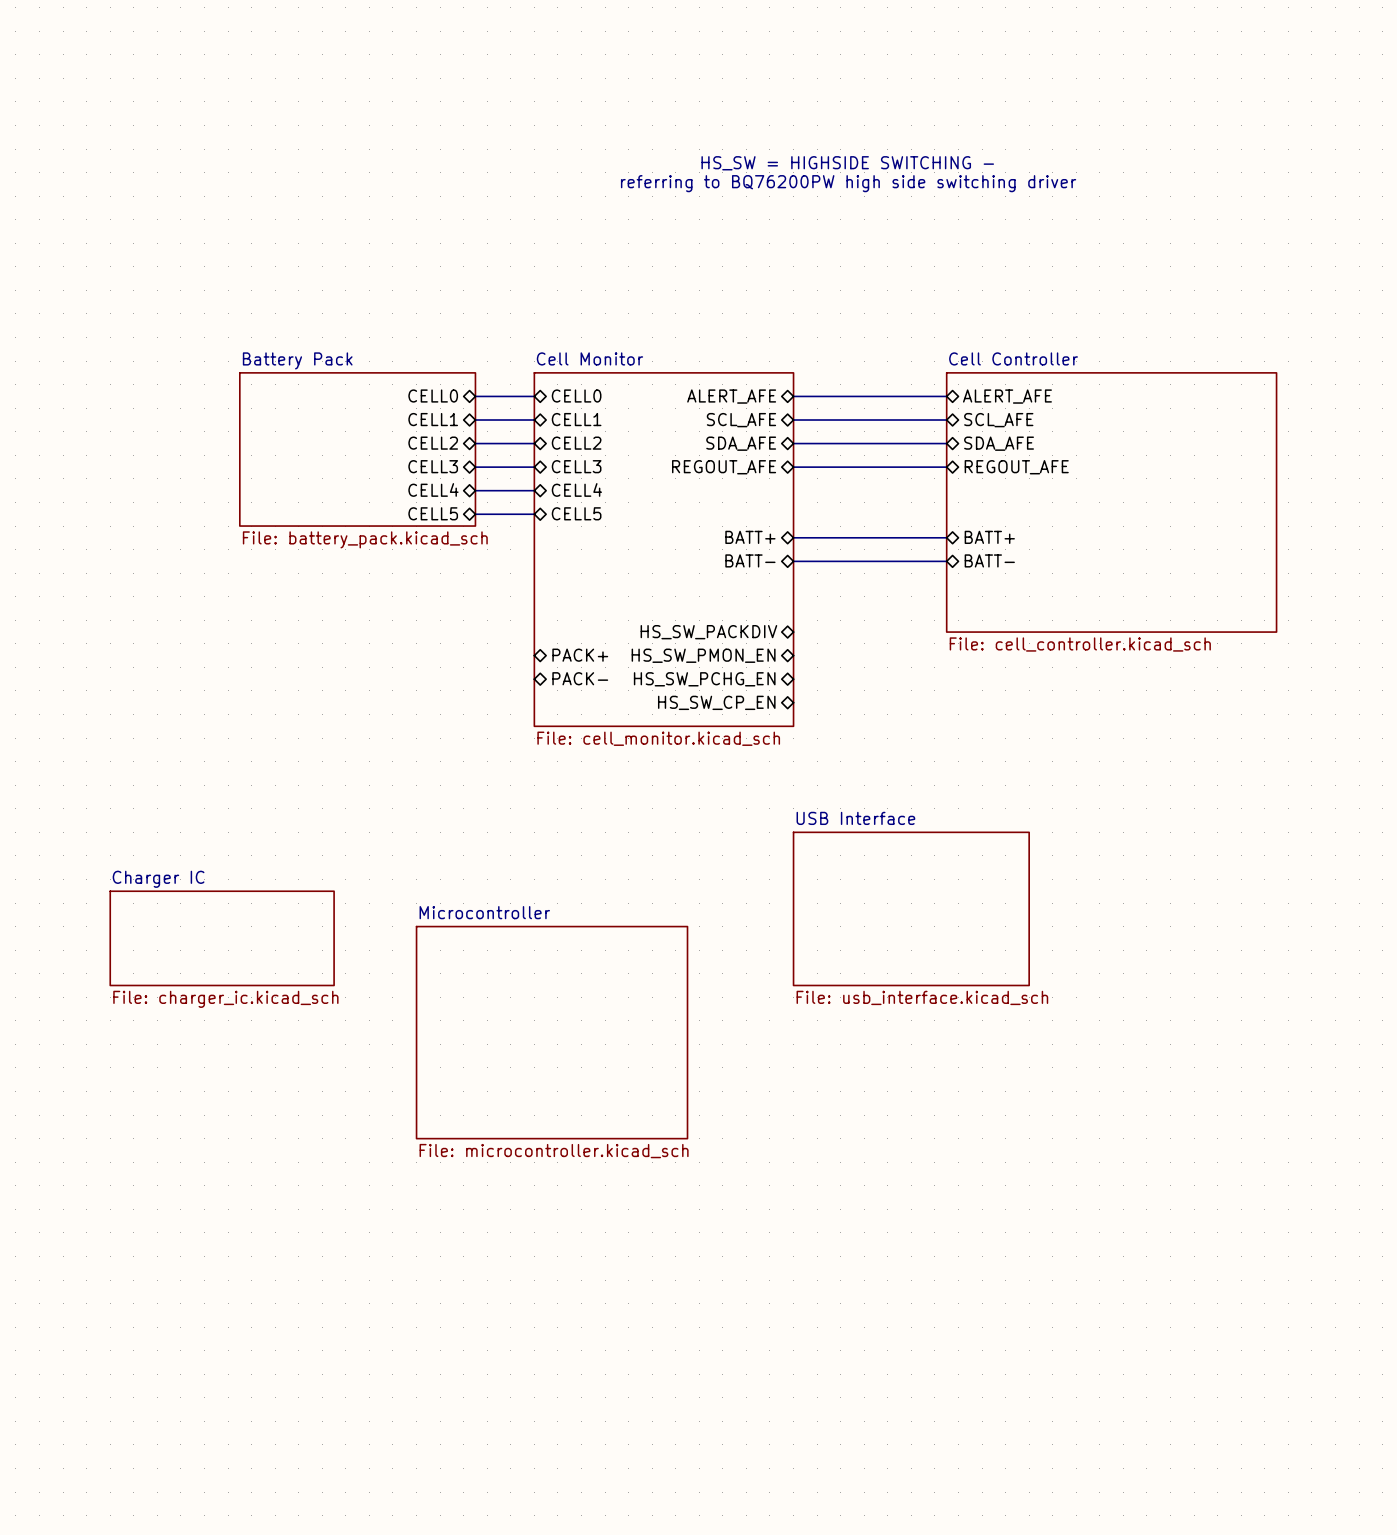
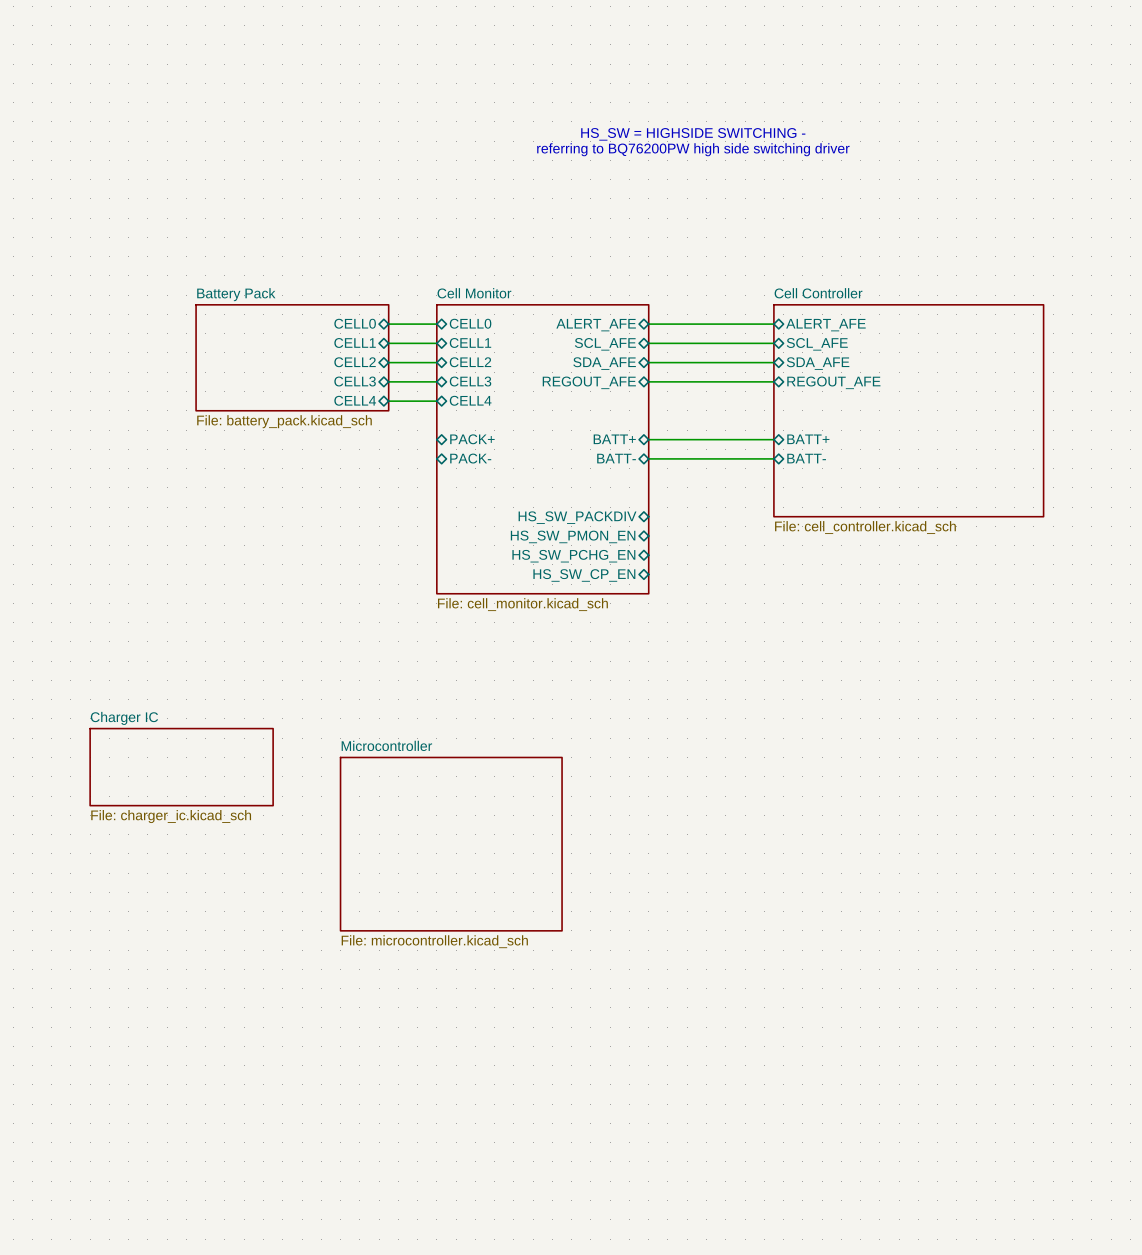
sheet Battery Pack: none -> File: battery_pack.kicad_sch (292, 357)
sheet Battery Pack: File: battery_pack.kicad_sch (357, 449) -> none
sheet pin: CELL5 (433, 513) -> none
sheet pin: CELL5 (576, 513) -> none
wire: (475, 514) (534, 514) -> none
sheet pin position: PACK+ (580, 655) -> PACK+ (472, 439)
sheet pin position: PACK- (580, 678) -> PACK- (470, 458)
sheet USB Interface: File: usb_interface.kicad_sch (911, 908) -> none

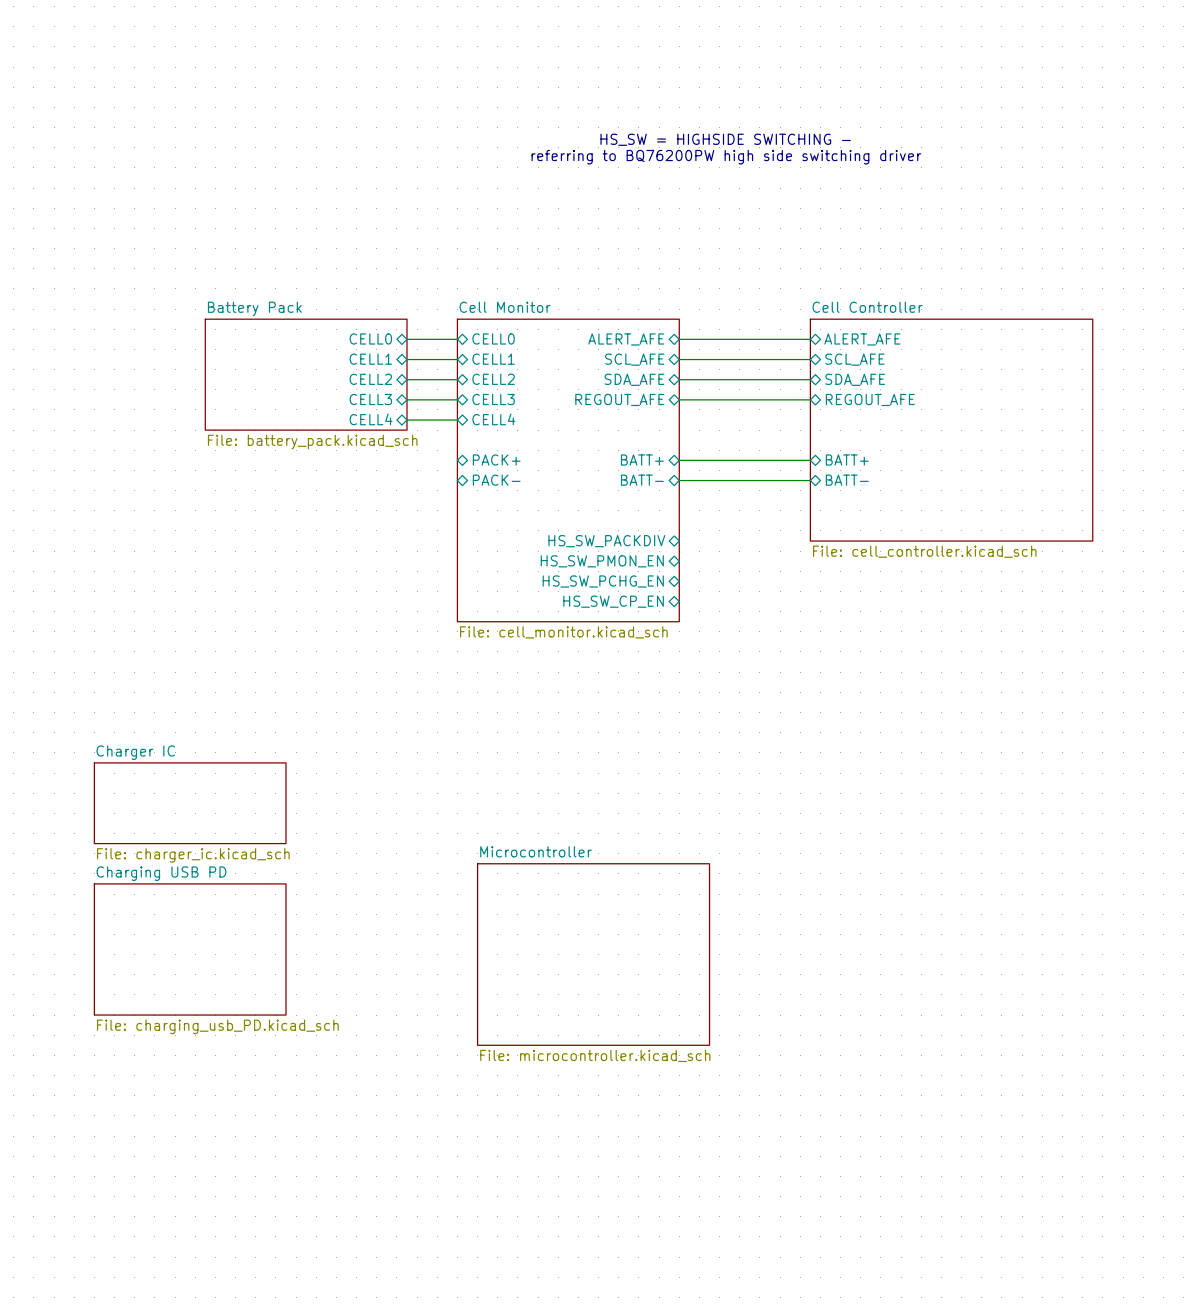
sheet Microcontroller position: (451, 844) -> (593, 954)
sheet Charging USB PD: none -> File: charging_usb_PD.kicad_sch (190, 949)

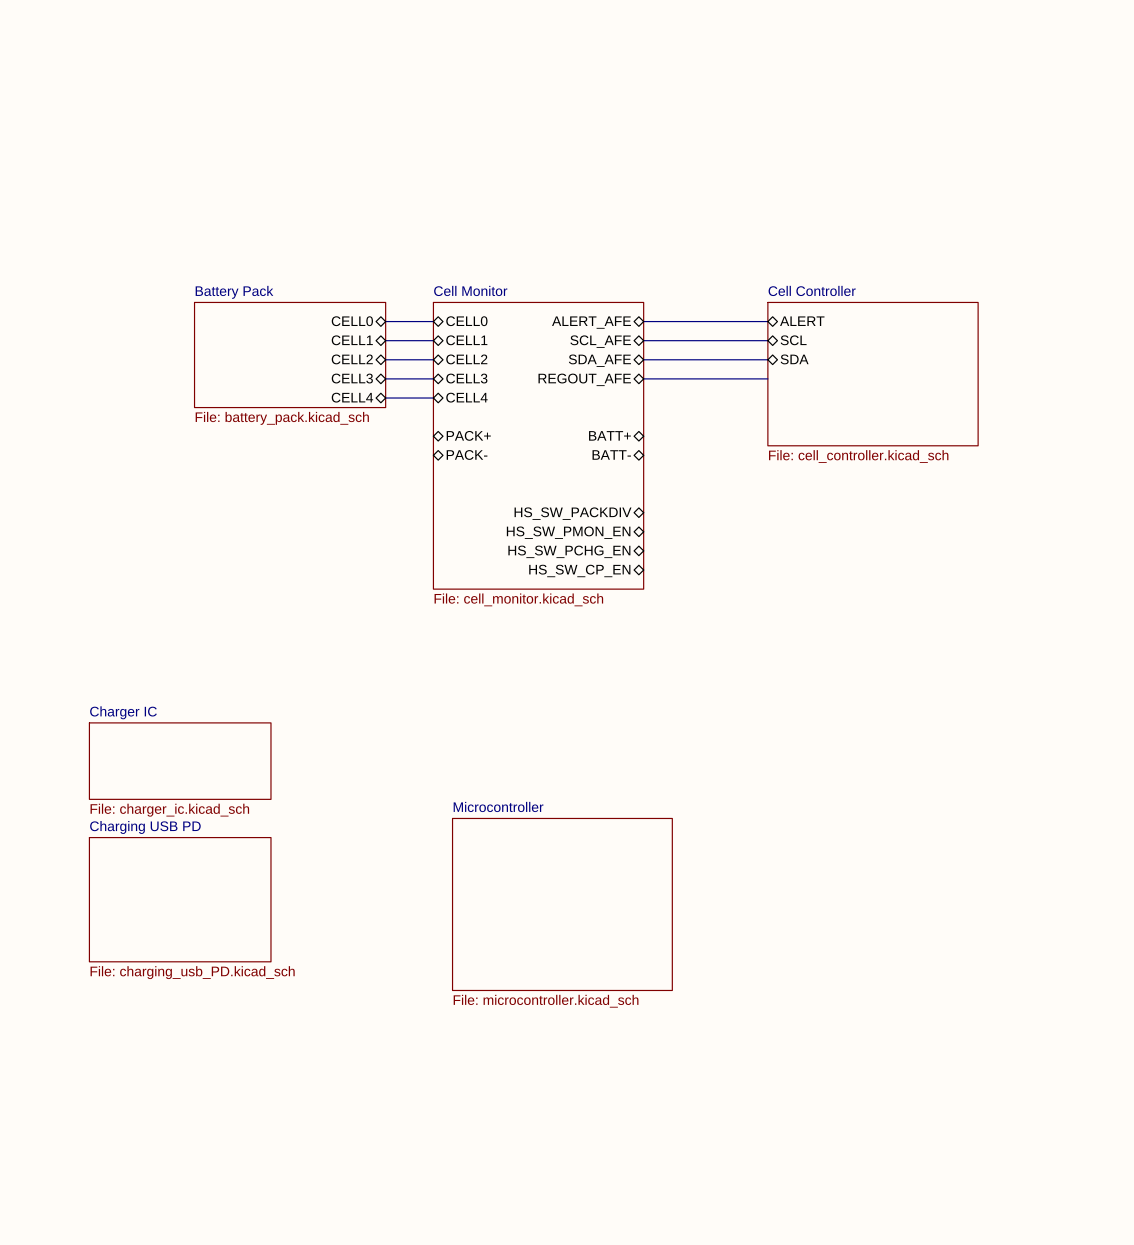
text: HS_SW = HIGHSIDE SWITCHING - (725, 139) -> none
text: referring to BQ76200PW high side switching driver (726, 157) -> none
sheet pin: ALERT_AFE (862, 339) -> ALERT (802, 321)
sheet pin: SCL_AFE (854, 359) -> SCL (793, 340)
sheet pin: SDA_AFE (855, 379) -> SDA (794, 359)
sheet Cell Controller: none -> File: cell_controller.kicad_sch (873, 374)
sheet pin: REGOUT_AFE (870, 399) -> none
sheet Cell Controller: File: cell_controller.kicad_sch (951, 430) -> none
sheet pin: BATT+ (847, 459) -> none
wire: (679, 460) (810, 460) -> none
wire: (679, 480) (810, 480) -> none
sheet pin: BATT- (847, 480) -> none

